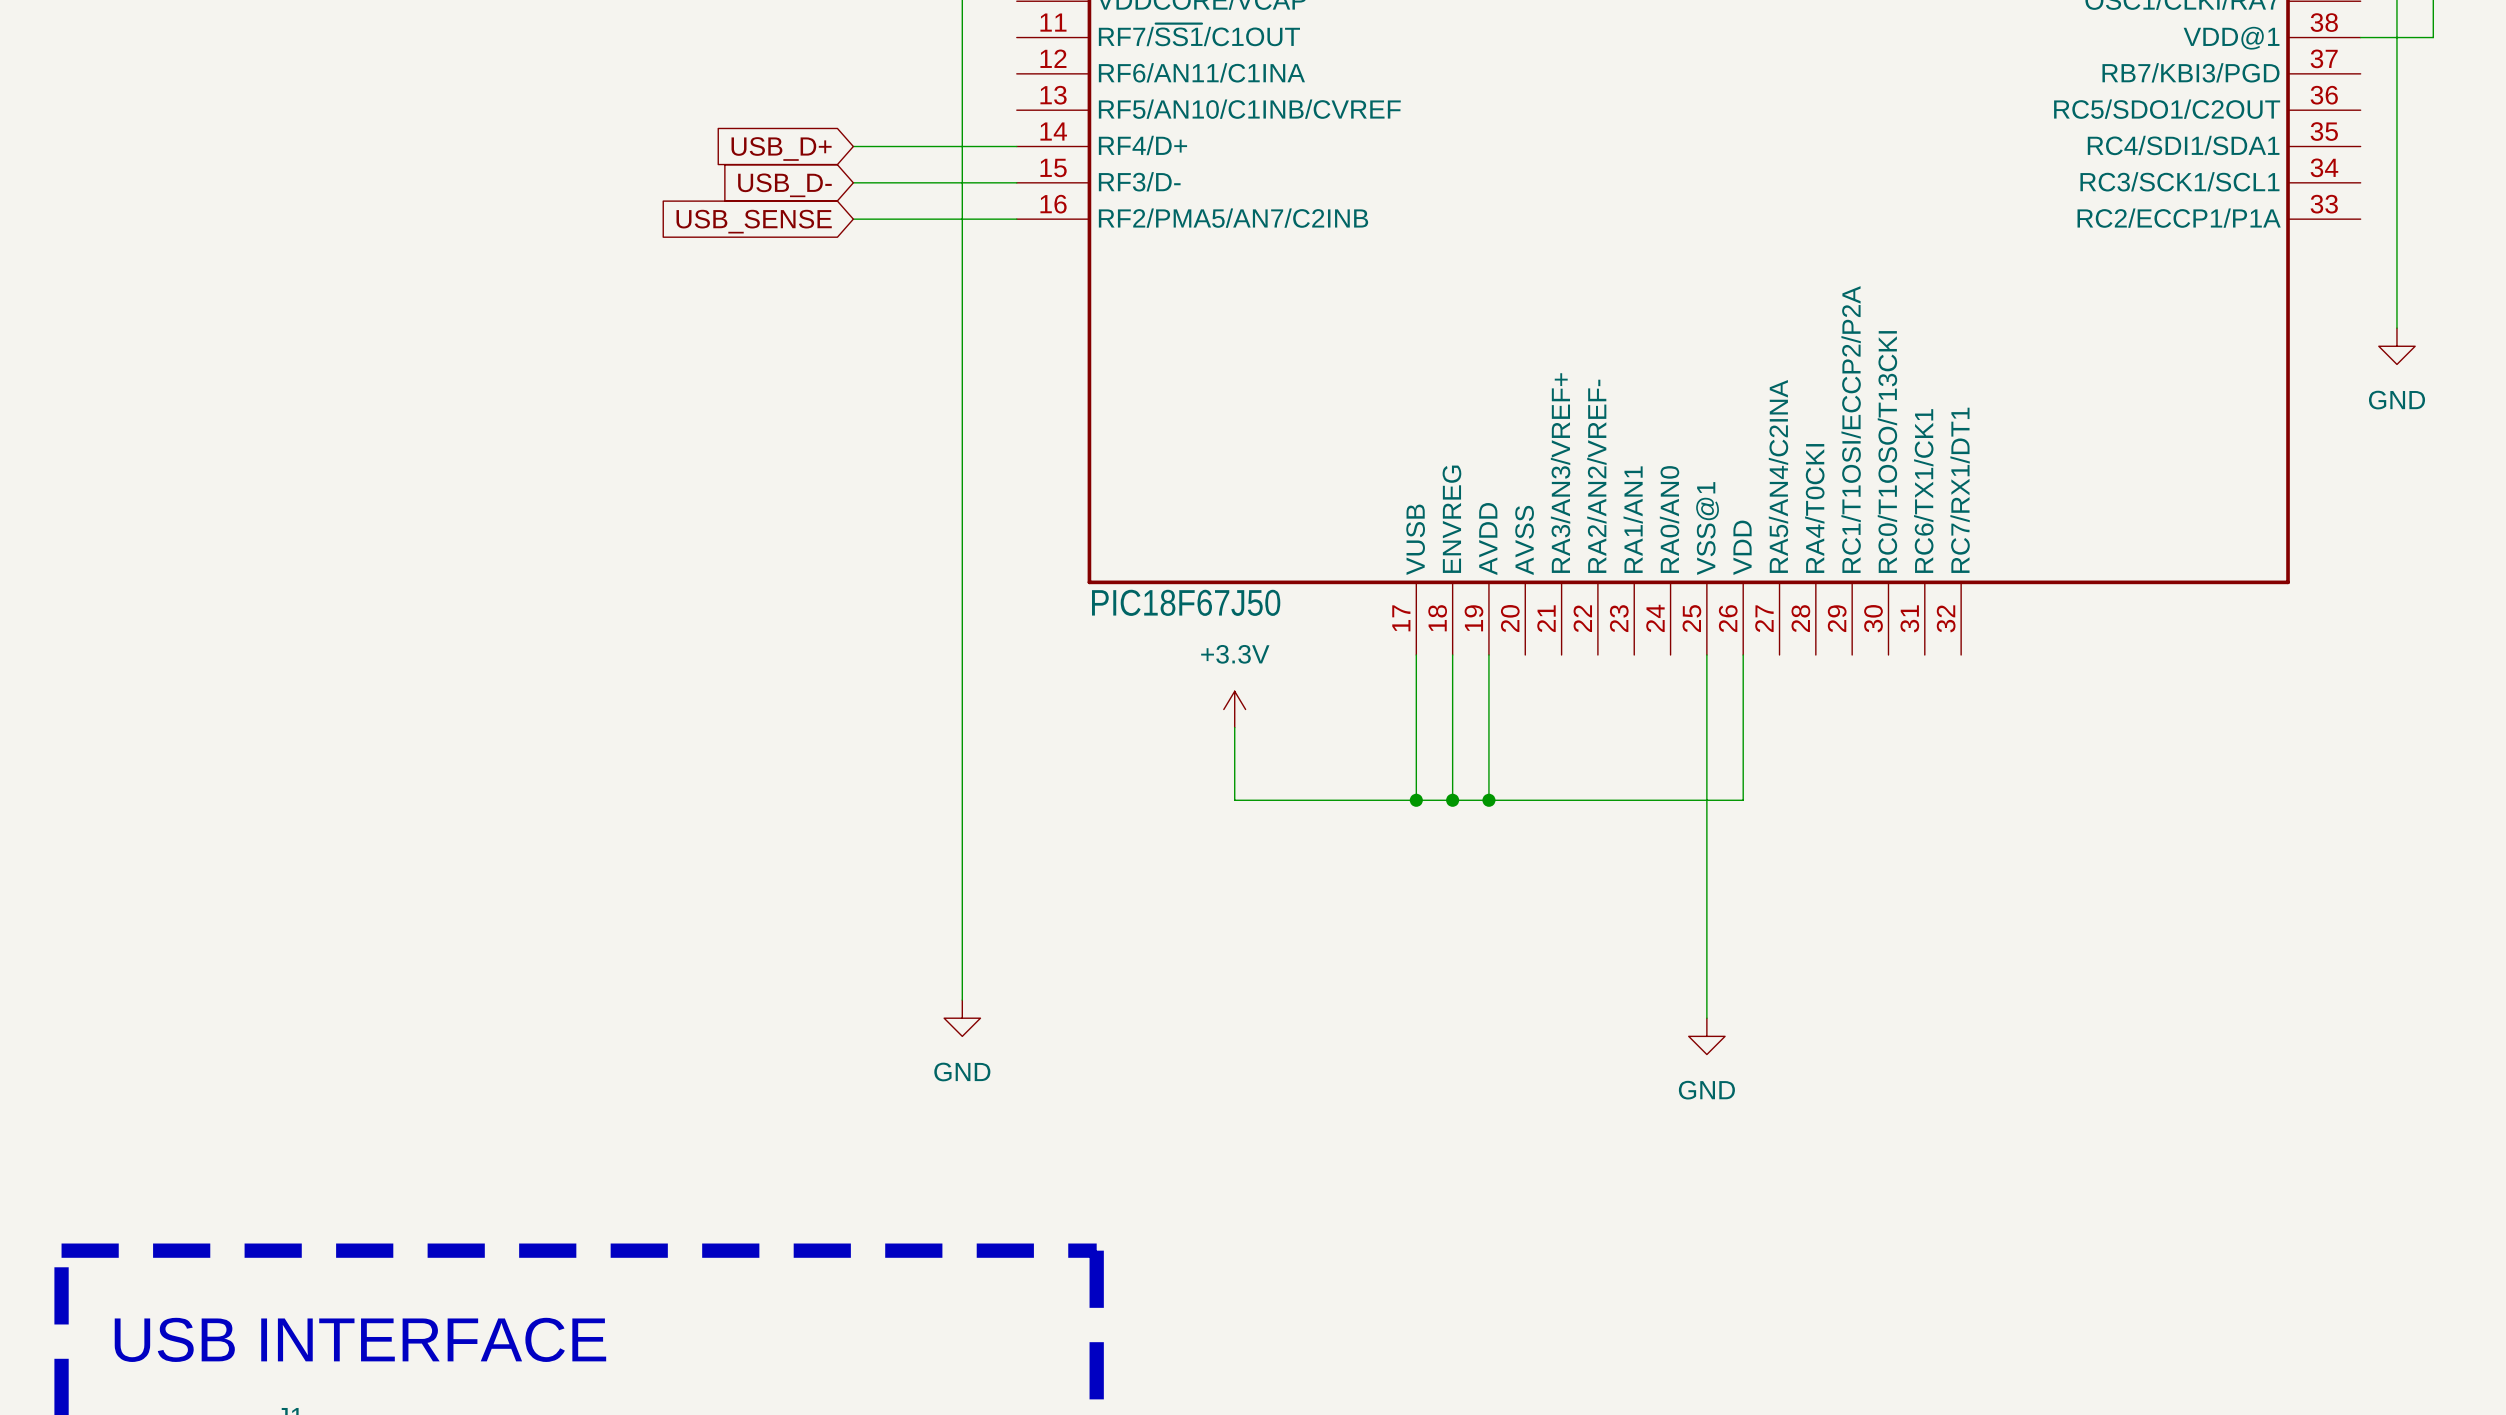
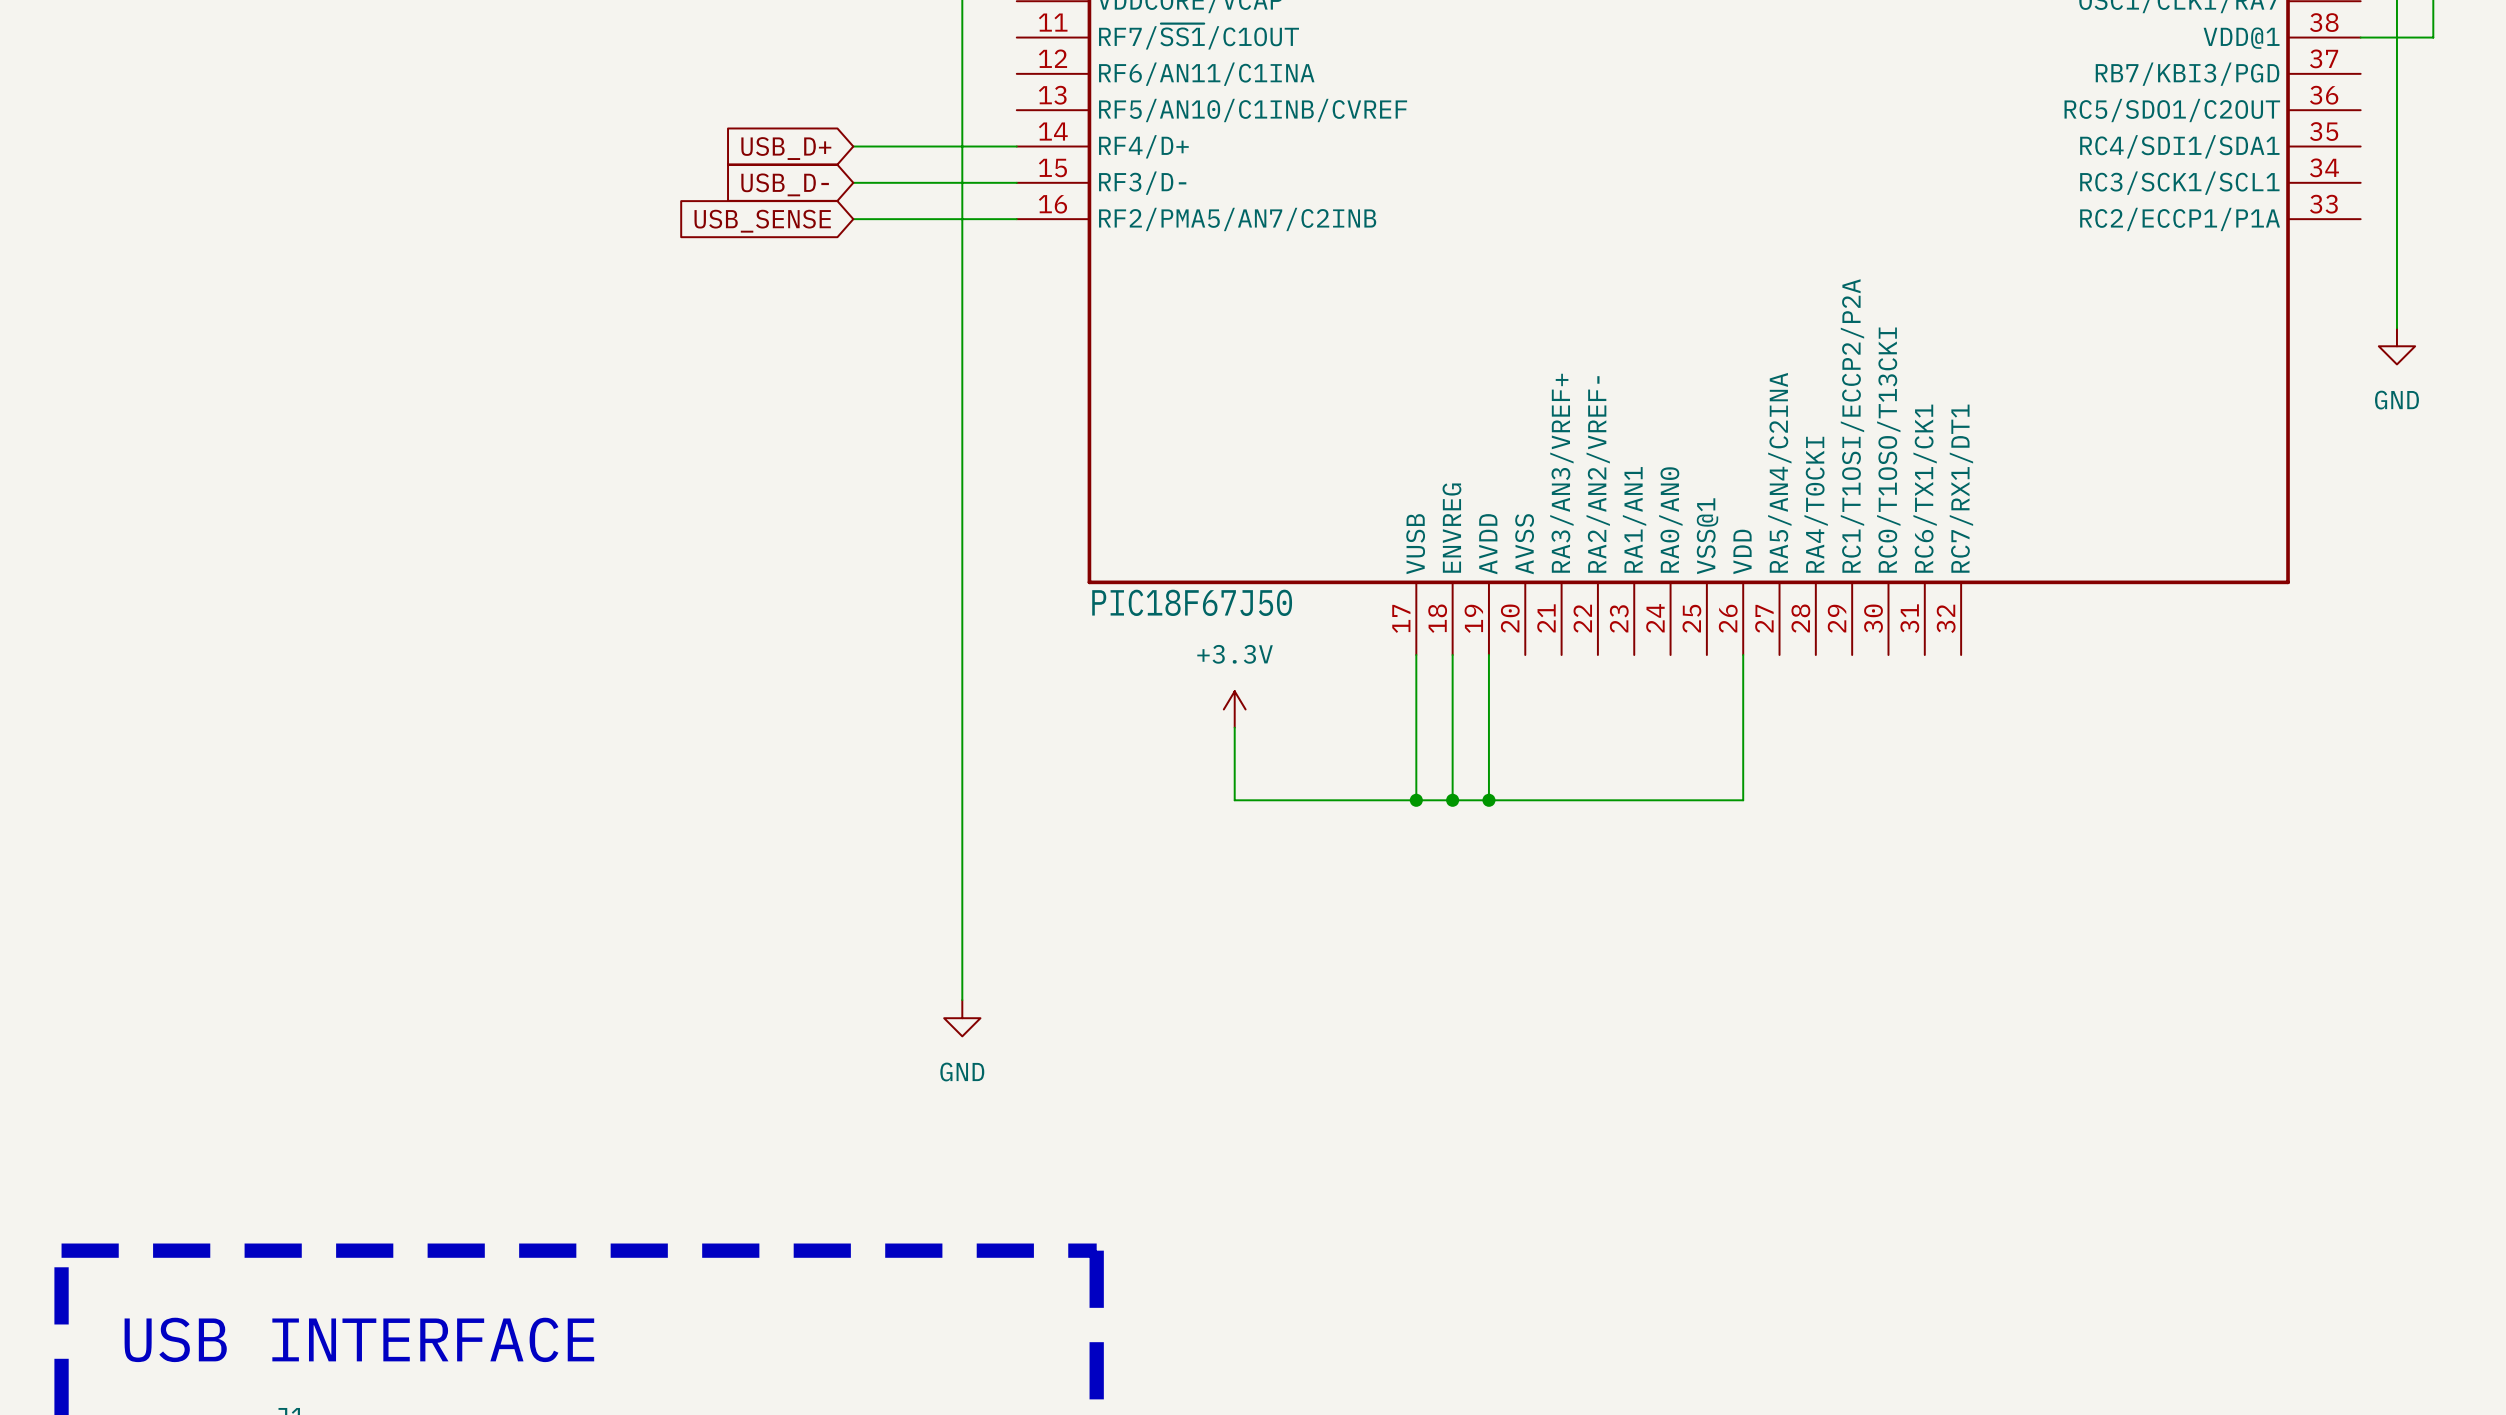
wire: (1706, 655) (1706, 1018) -> none
power symbol: GND (1706, 1036) -> none

